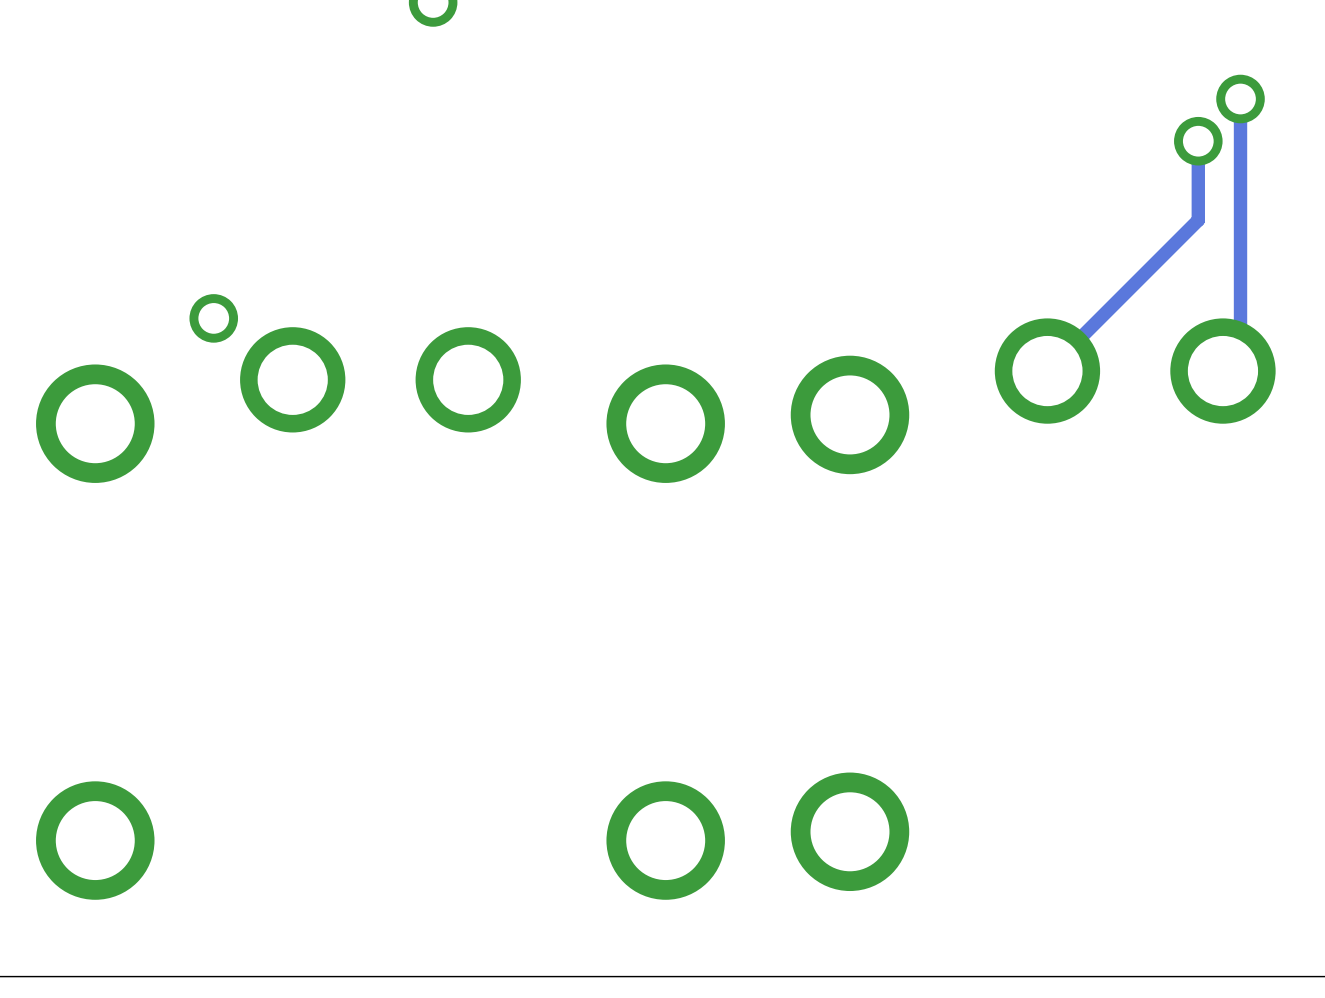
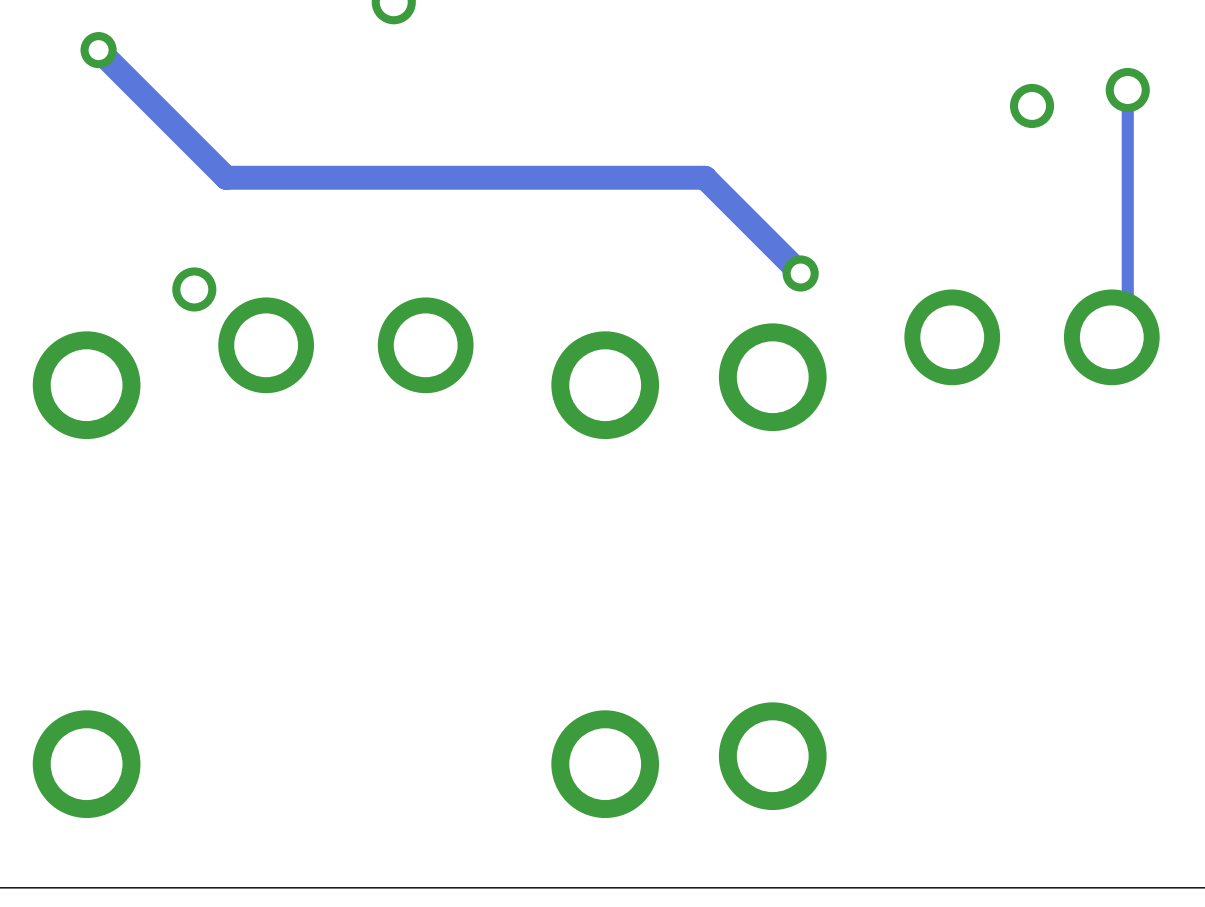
track: none -> (98, 50) (226, 177) (704, 177) (800, 273)
via: none -> (98, 50)
track: (1198, 141) (1198, 220) (1047, 371) -> none
via position: (1198, 141) -> (1032, 105)
via: none -> (800, 273)

